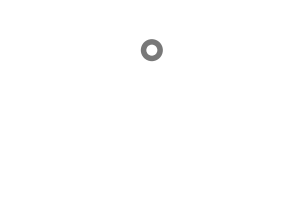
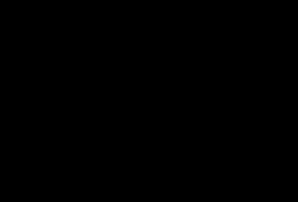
via: (151, 50) -> none

